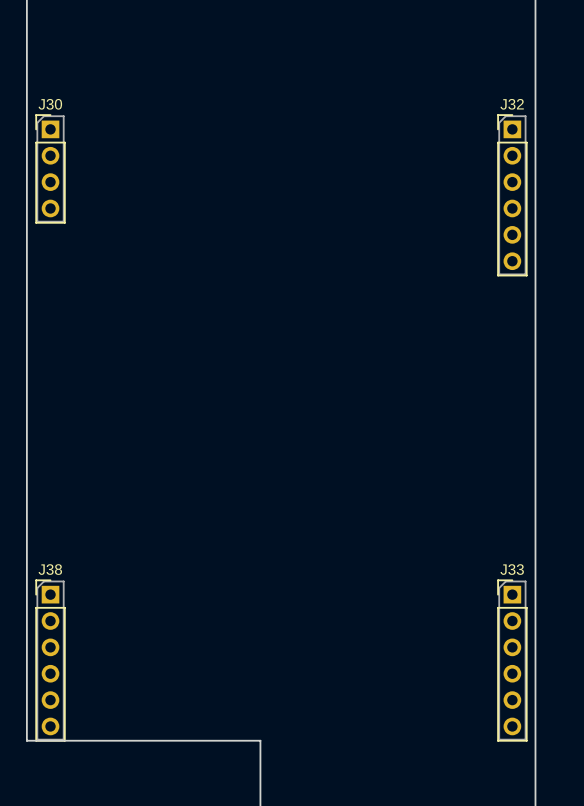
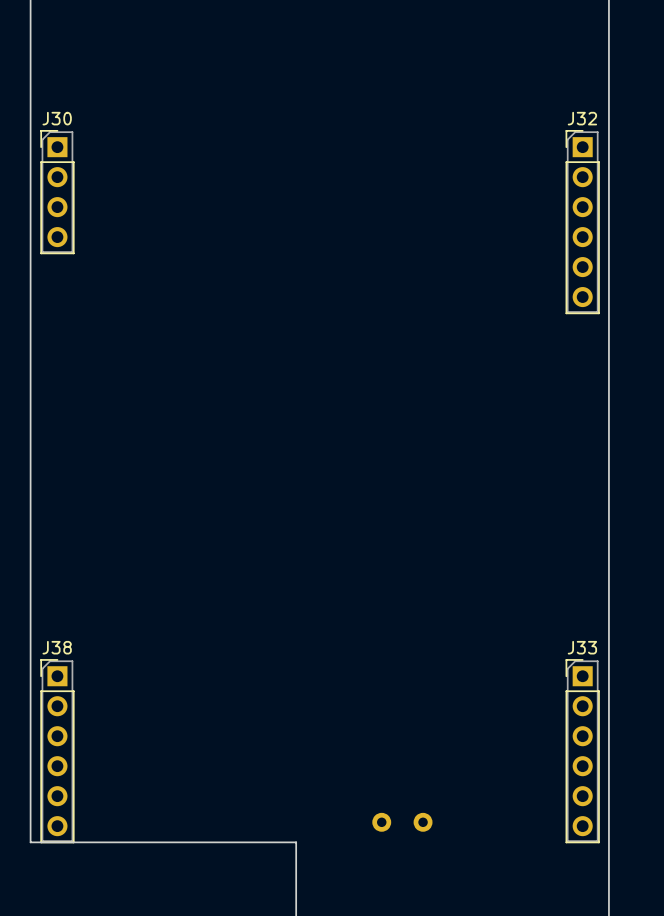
part: none -> (402, 822)

